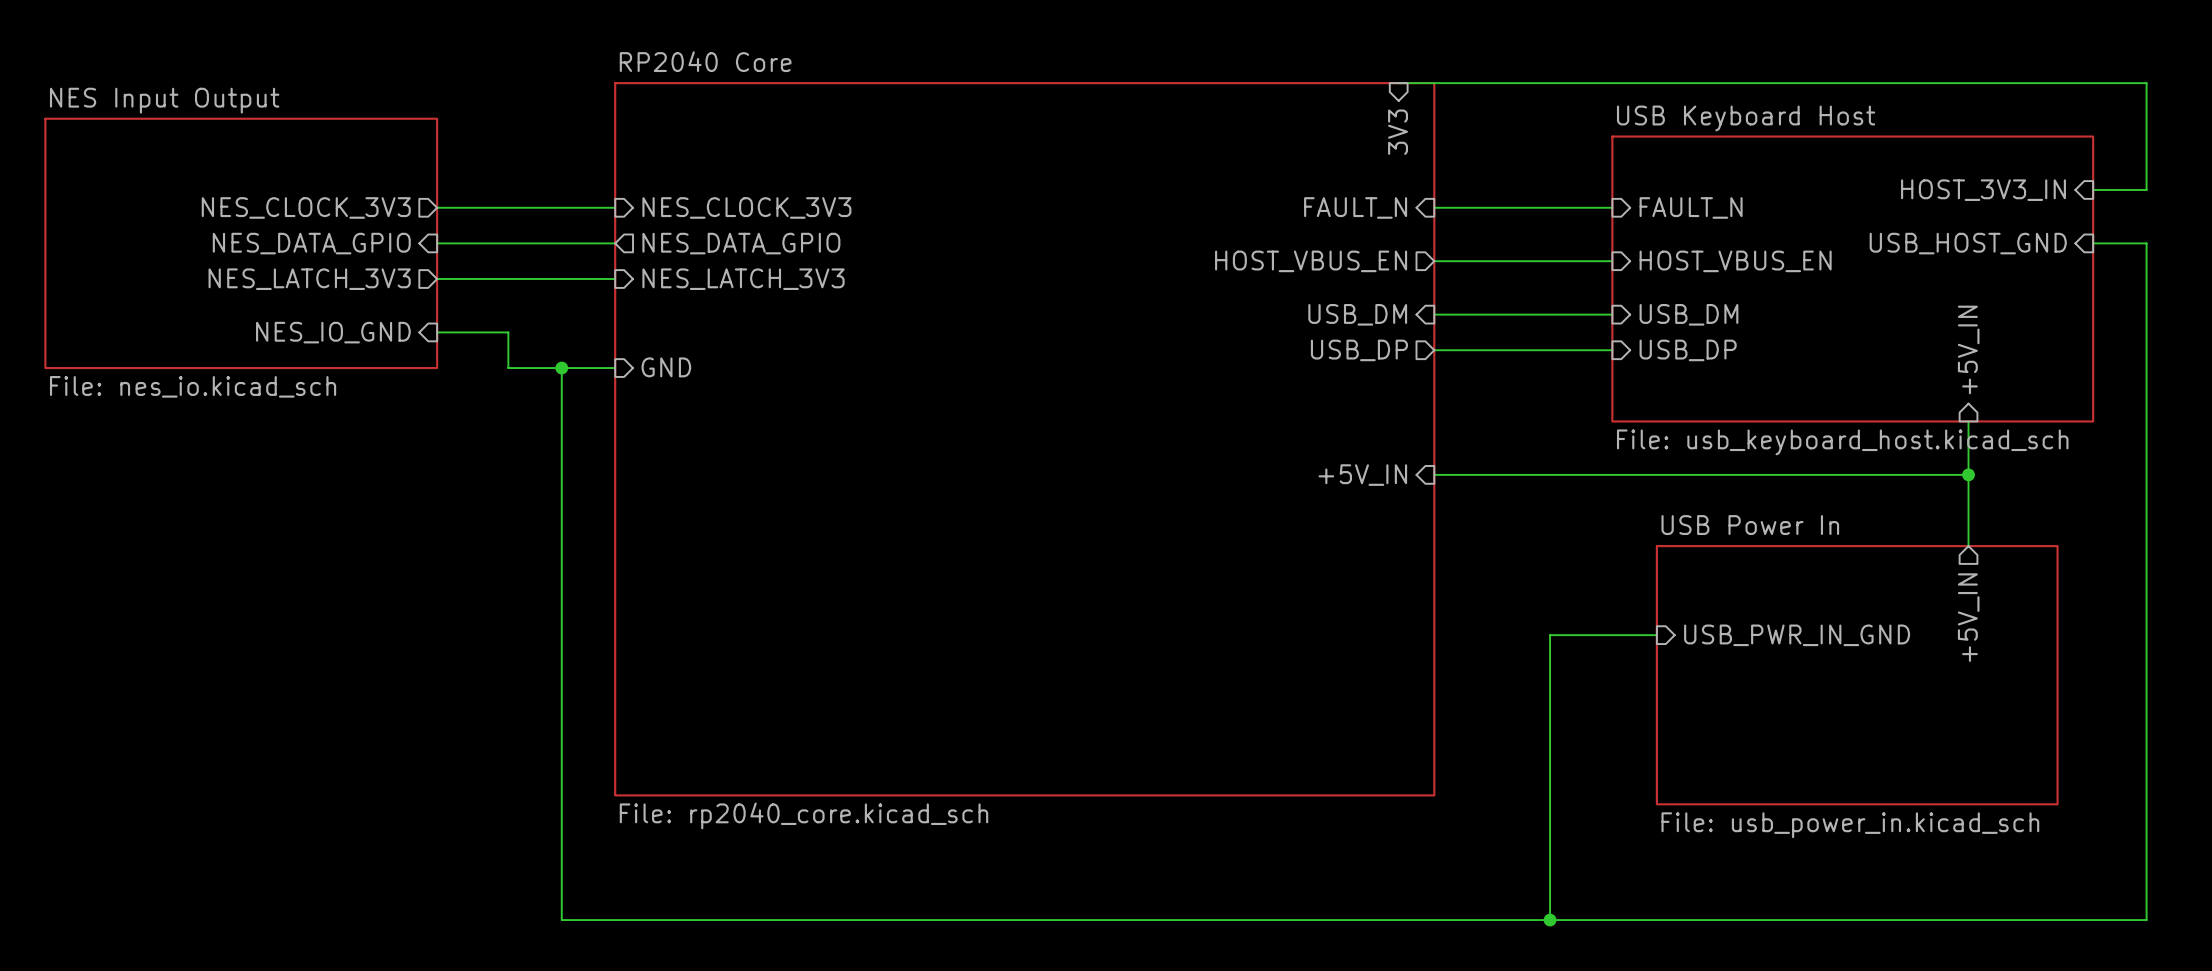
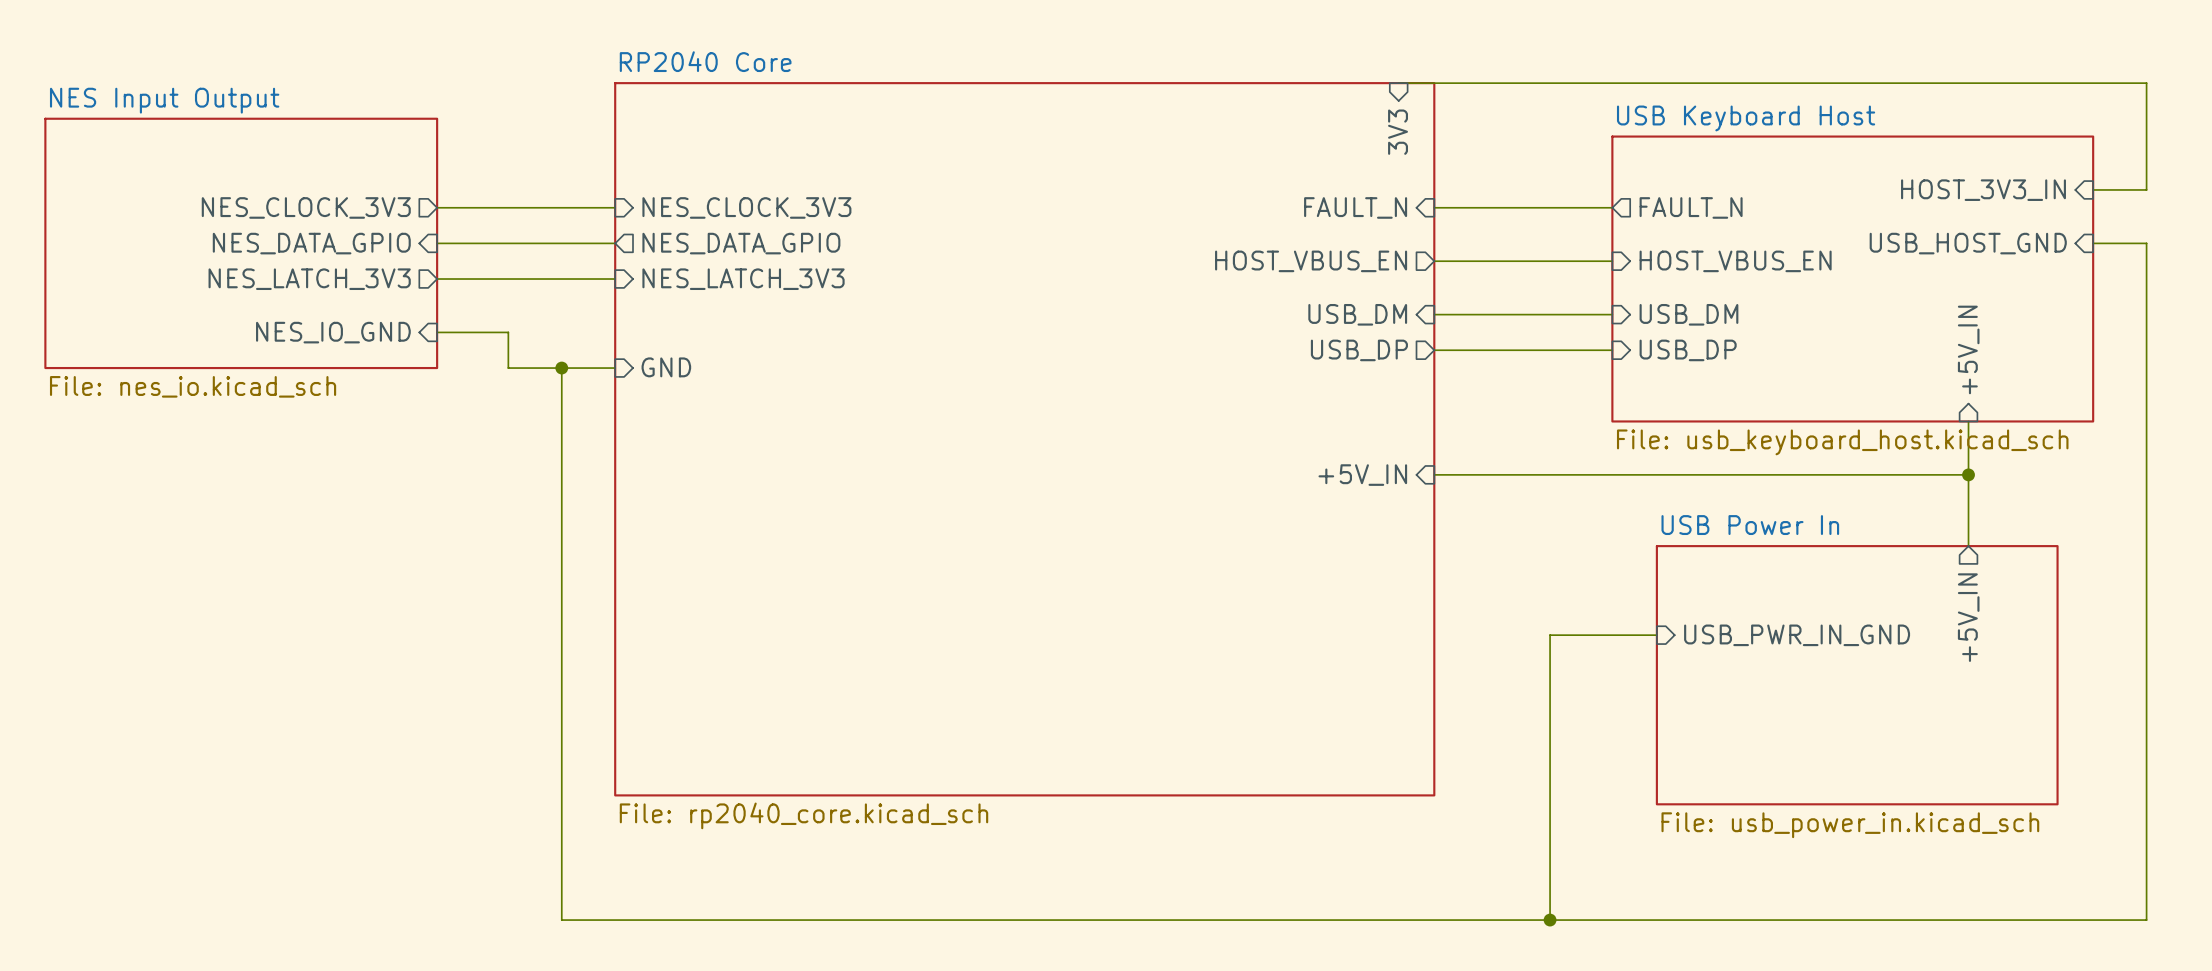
sheet pin shape: input (1691, 207) -> output (1691, 207)

